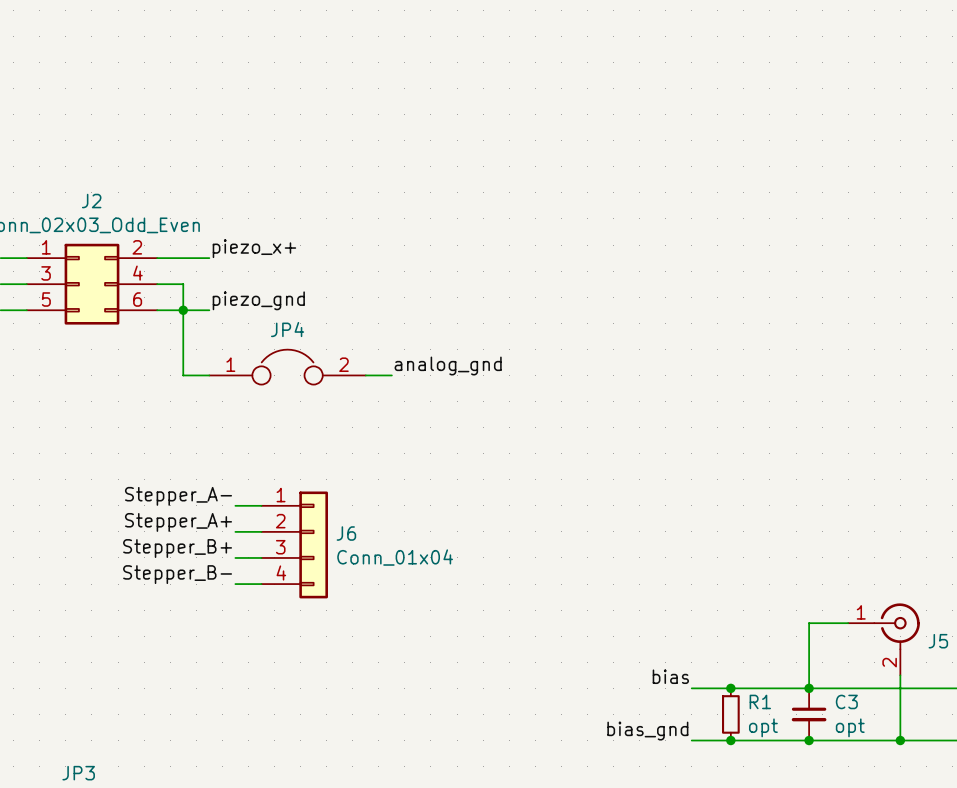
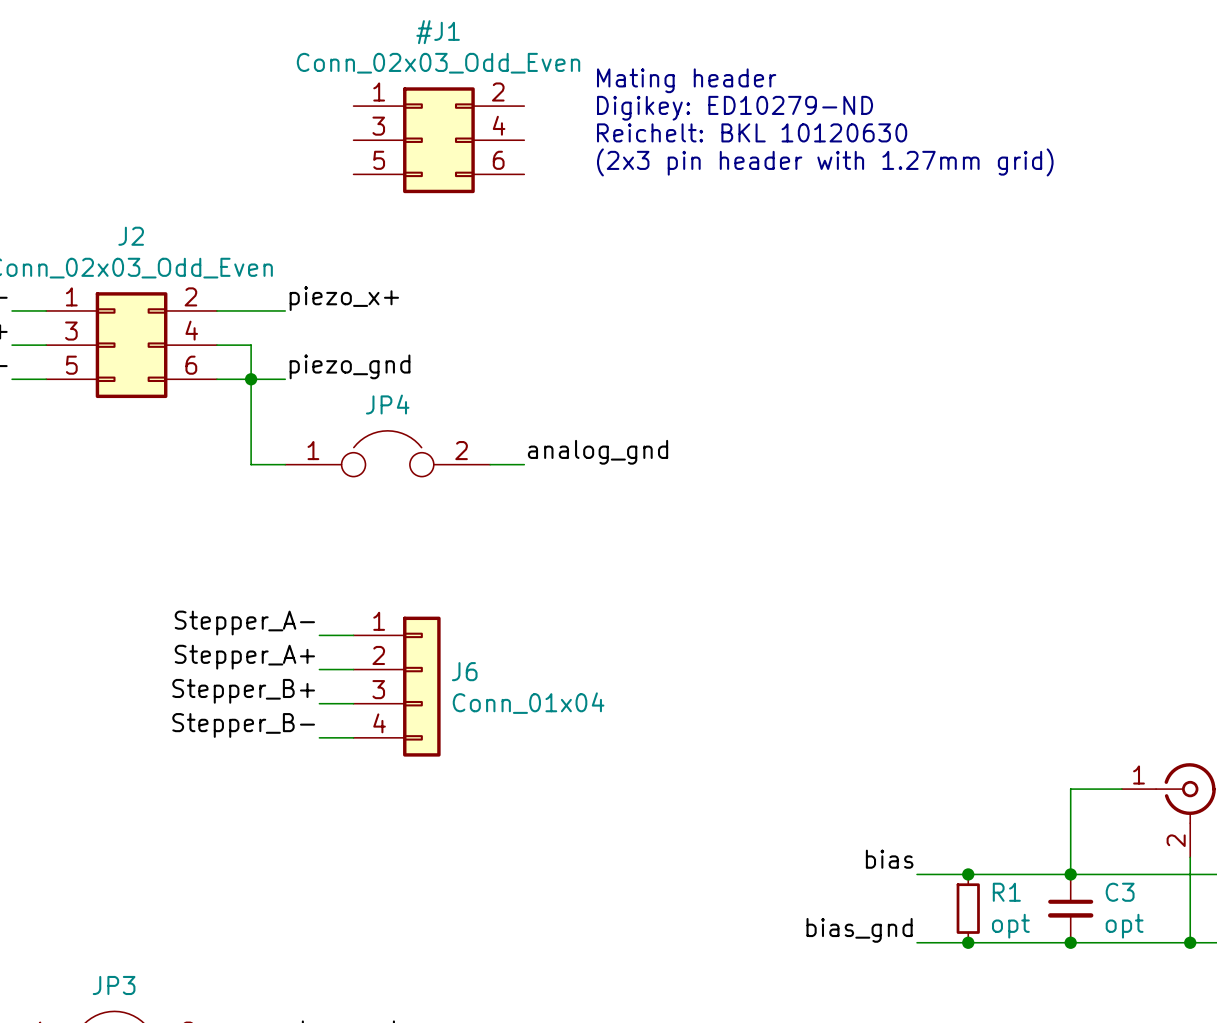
text: none -> Mating header (686, 80)
text: none -> Digikey: ED10279-ND (735, 108)
text: none -> Reichelt: BKL 10120630 (752, 132)
#J1: none -> Conn_02x03_Odd_Even (438, 140)
text: none -> (2x3 pin header with 1.27mm grid) (825, 162)

